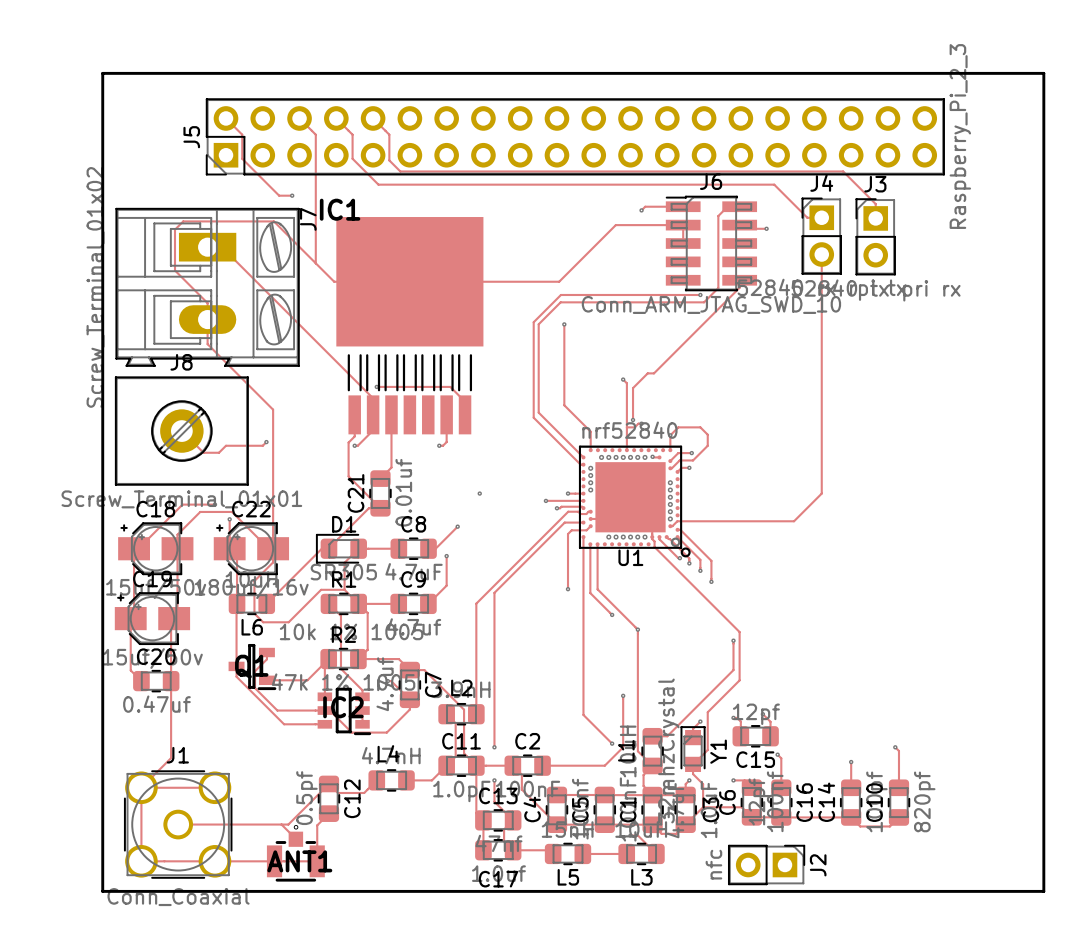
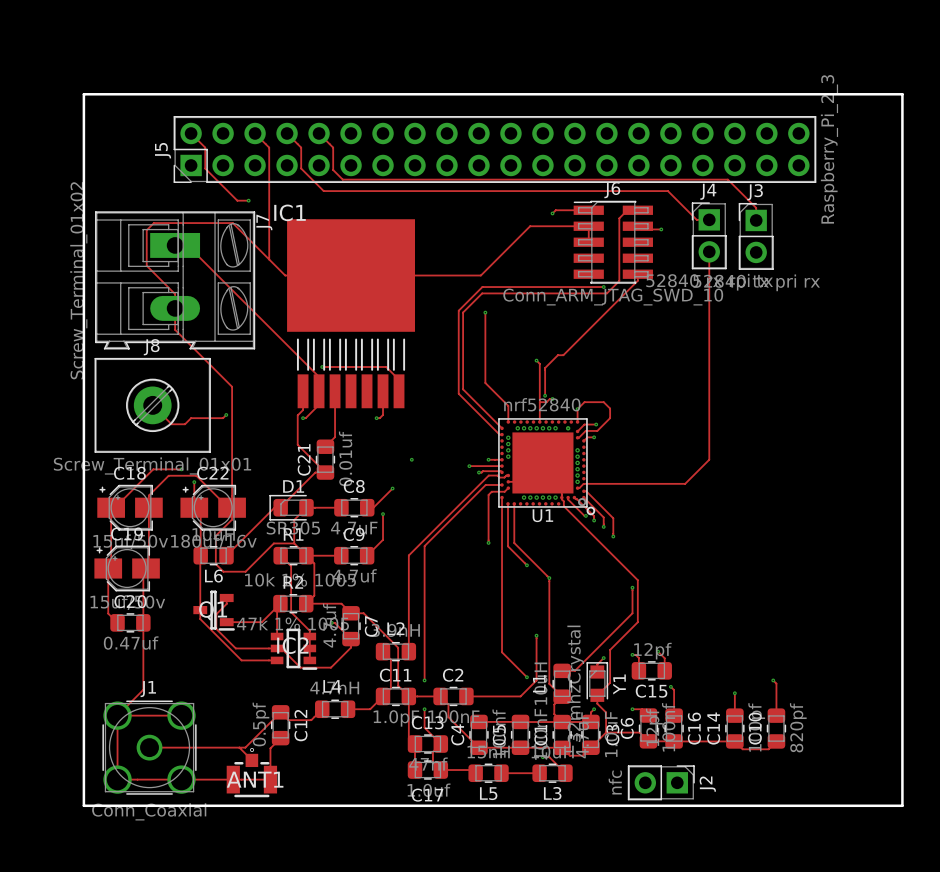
top track: (652, 456) (659, 457) -> none
via: (652, 456) -> none
via: none -> (568, 428)

